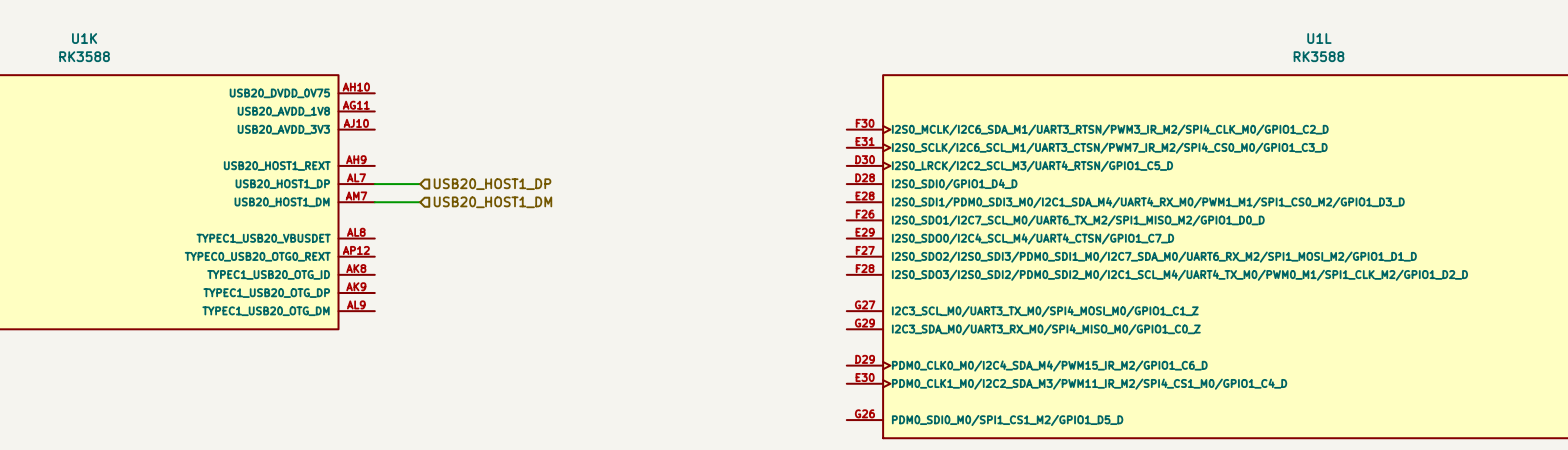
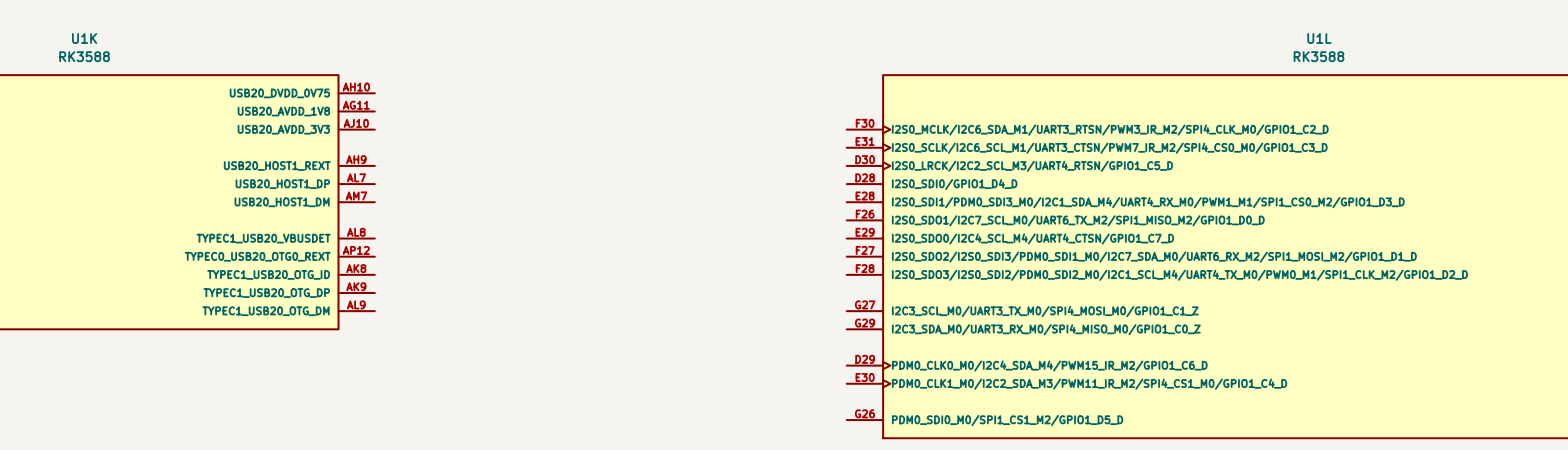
wire: (374, 184) (420, 184) -> none
hierarchical label: USB20_HOST1_DP (492, 184) -> none
wire: (374, 202) (420, 202) -> none
hierarchical label: USB20_HOST1_DM (492, 202) -> none

